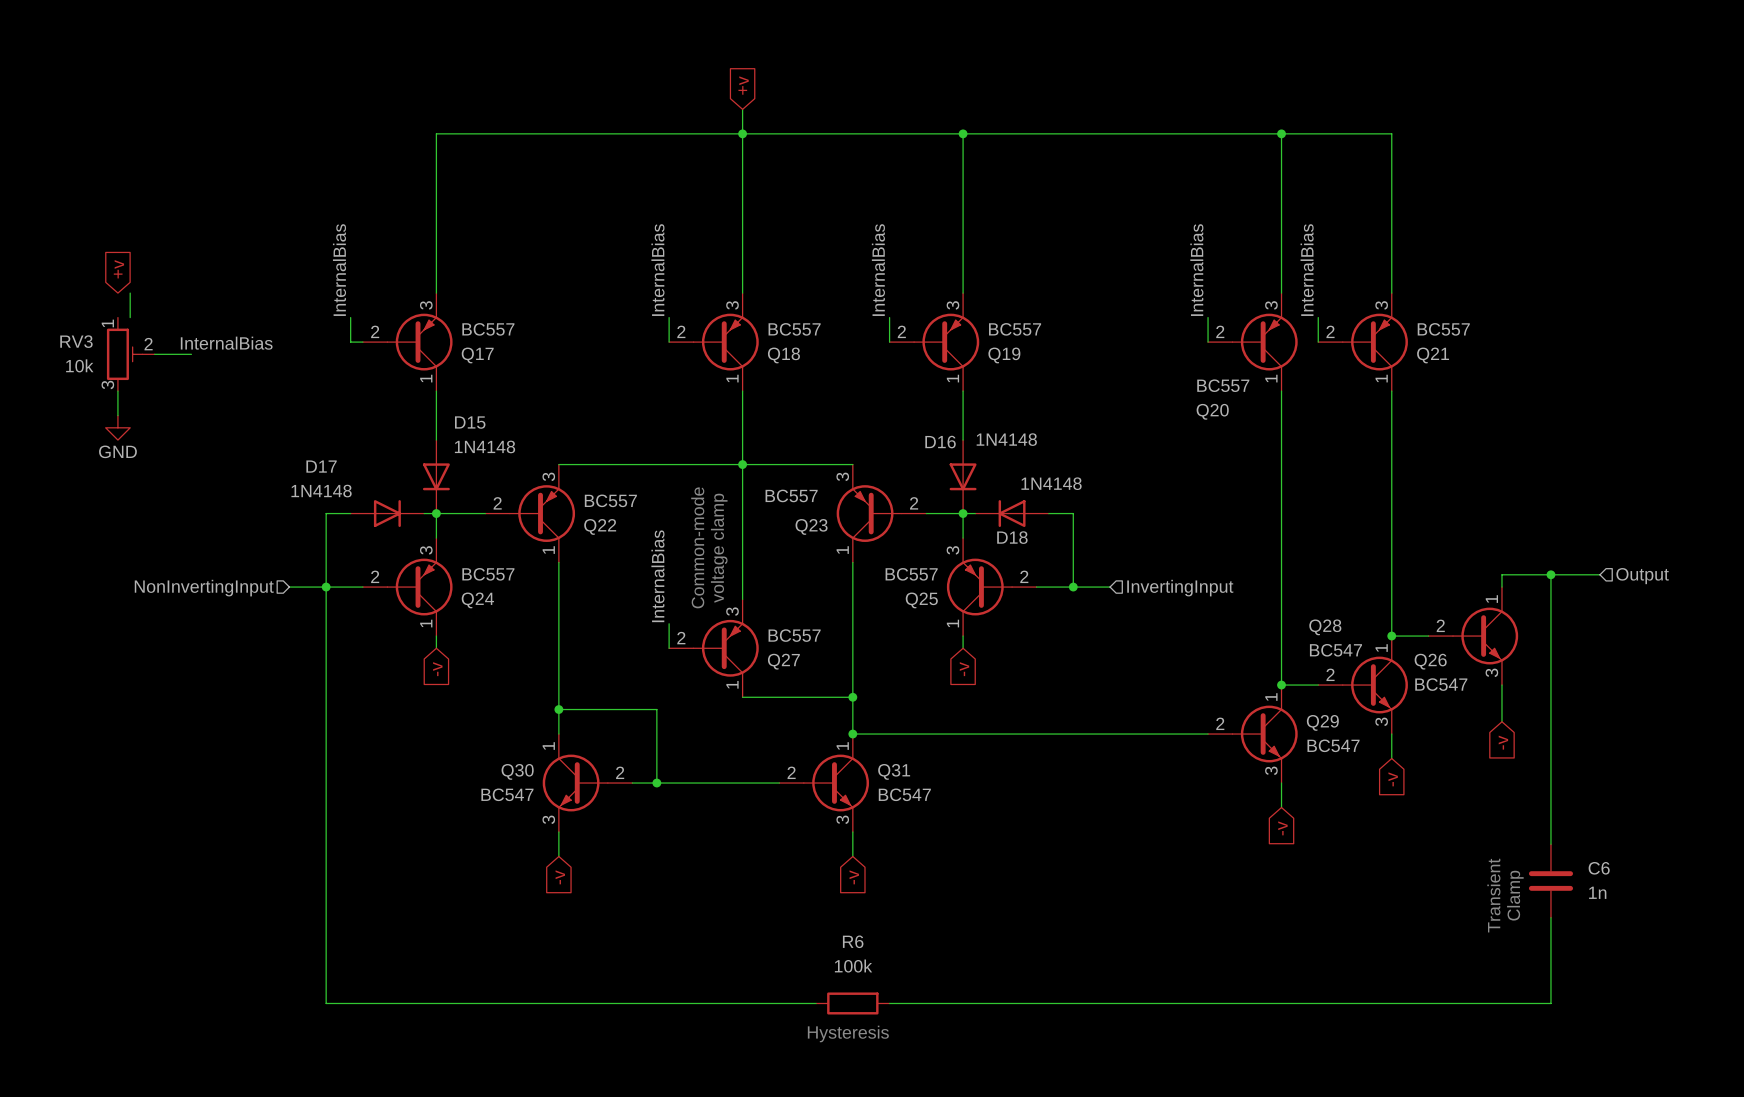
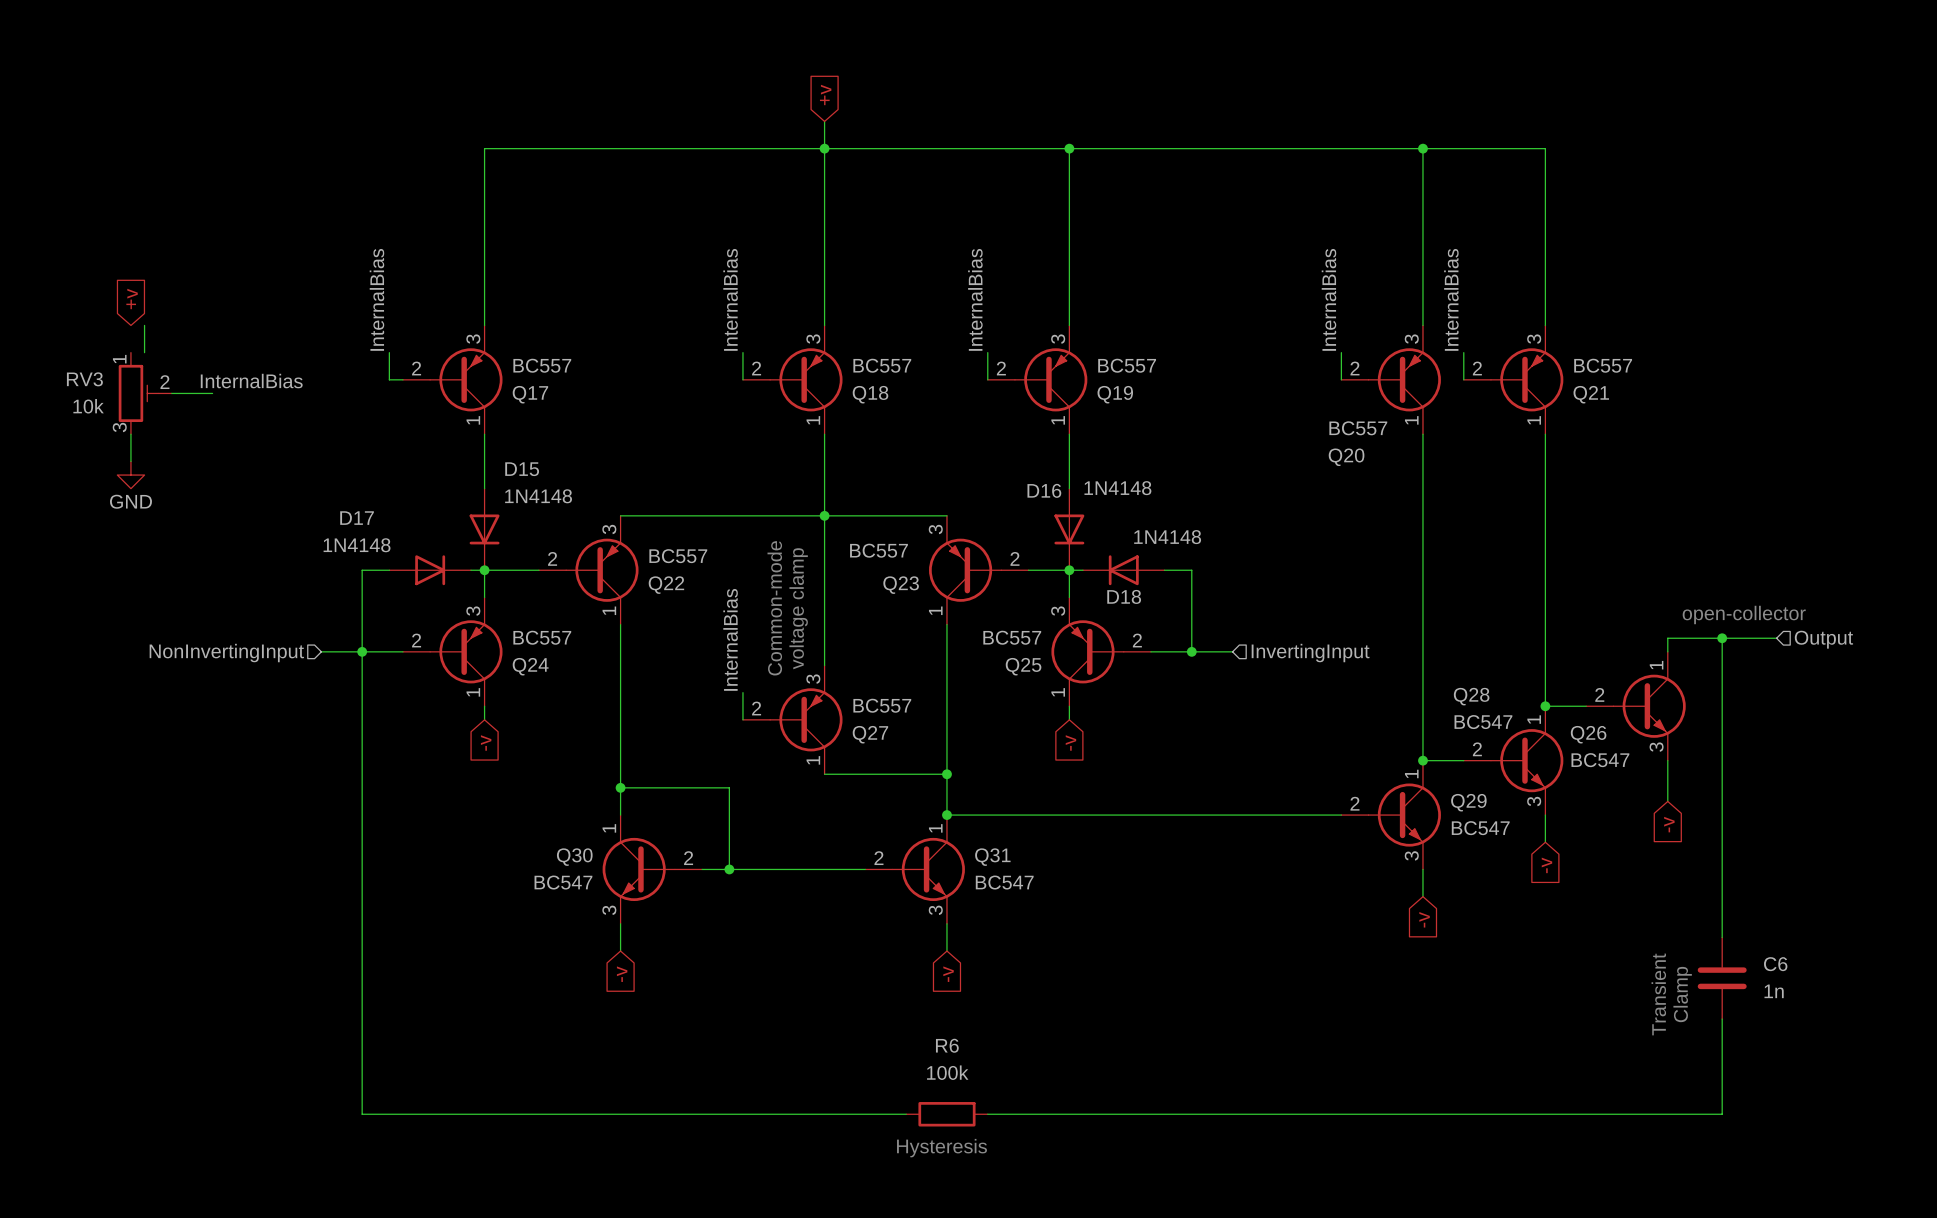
text: none -> open-collector (1744, 614)

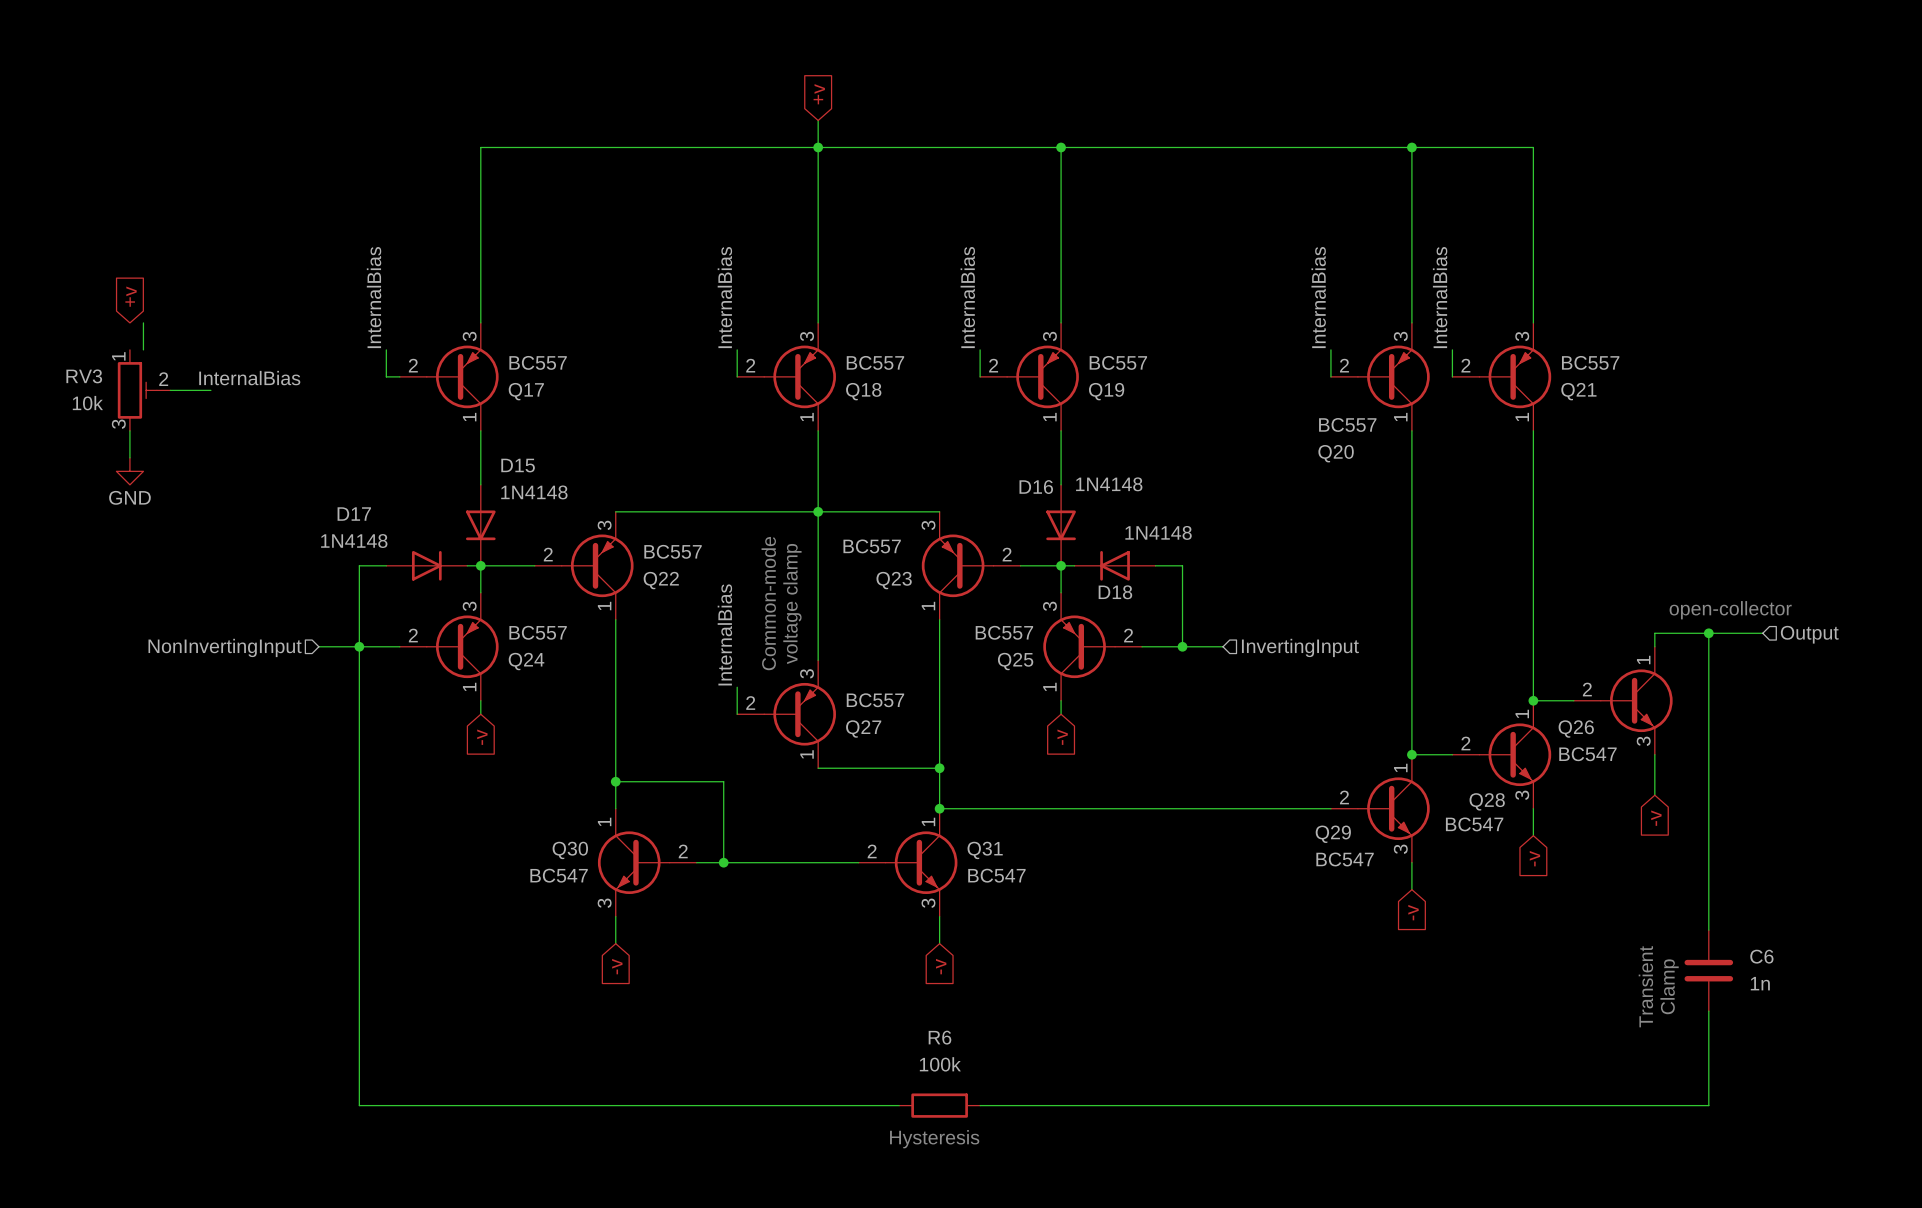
Q28 name position: Q28 (1471, 696) -> Q28 (1487, 801)
Q28 value position: BC547 (1483, 722) -> BC547 (1474, 824)
Q29 name position: Q29 (1468, 802) -> Q29 (1333, 834)
Q29 value position: BC547 (1480, 828) -> BC547 (1345, 859)

